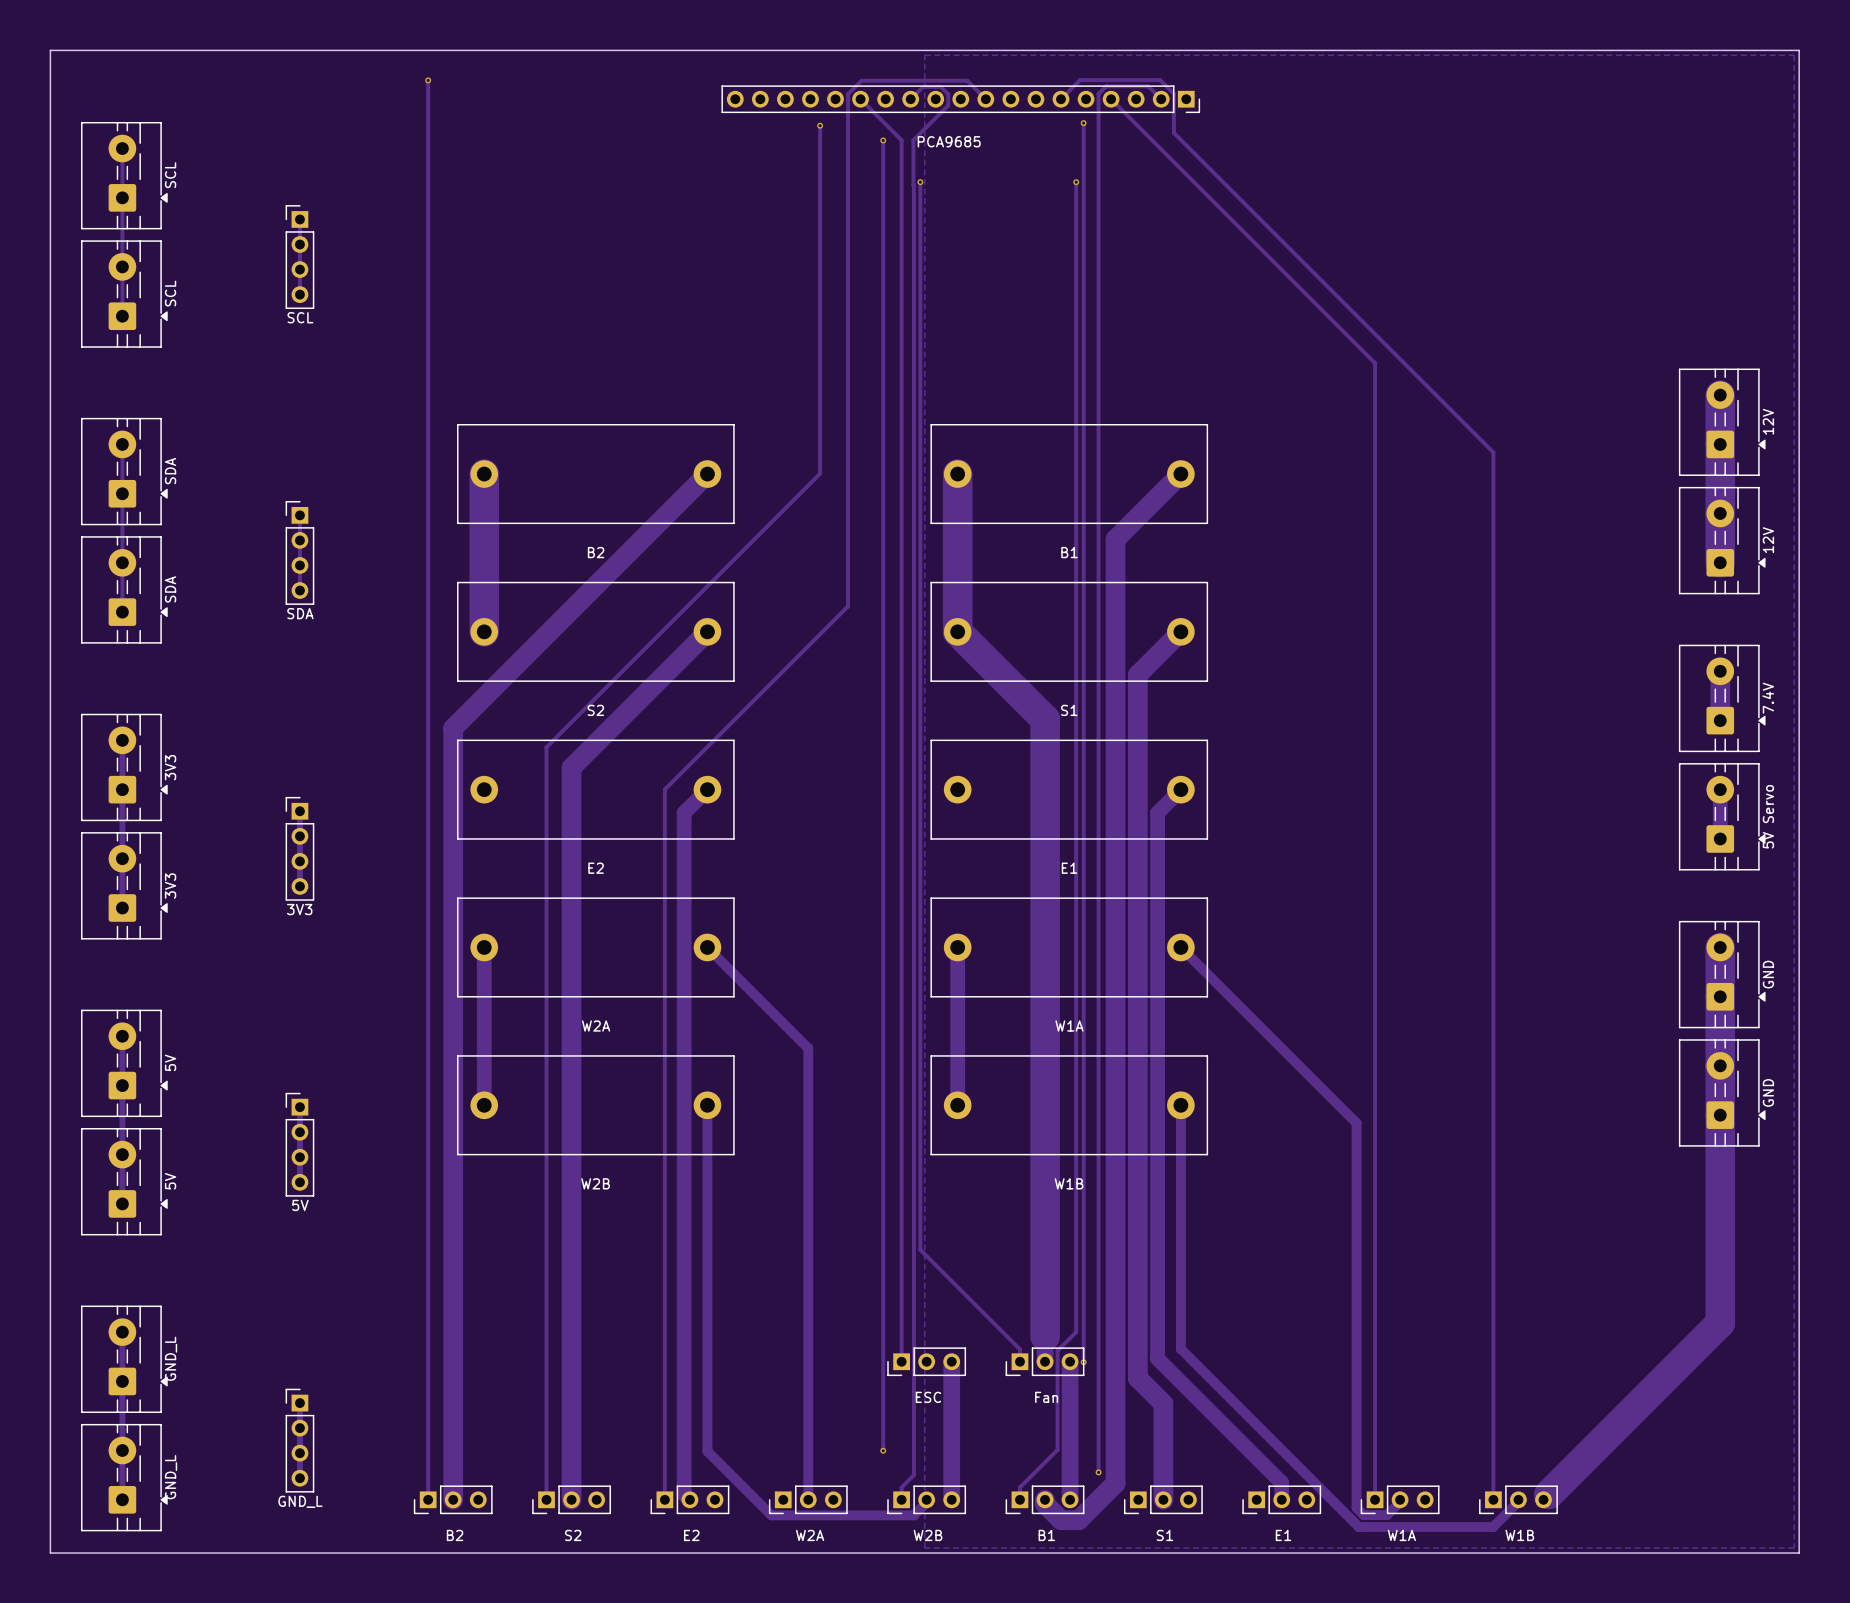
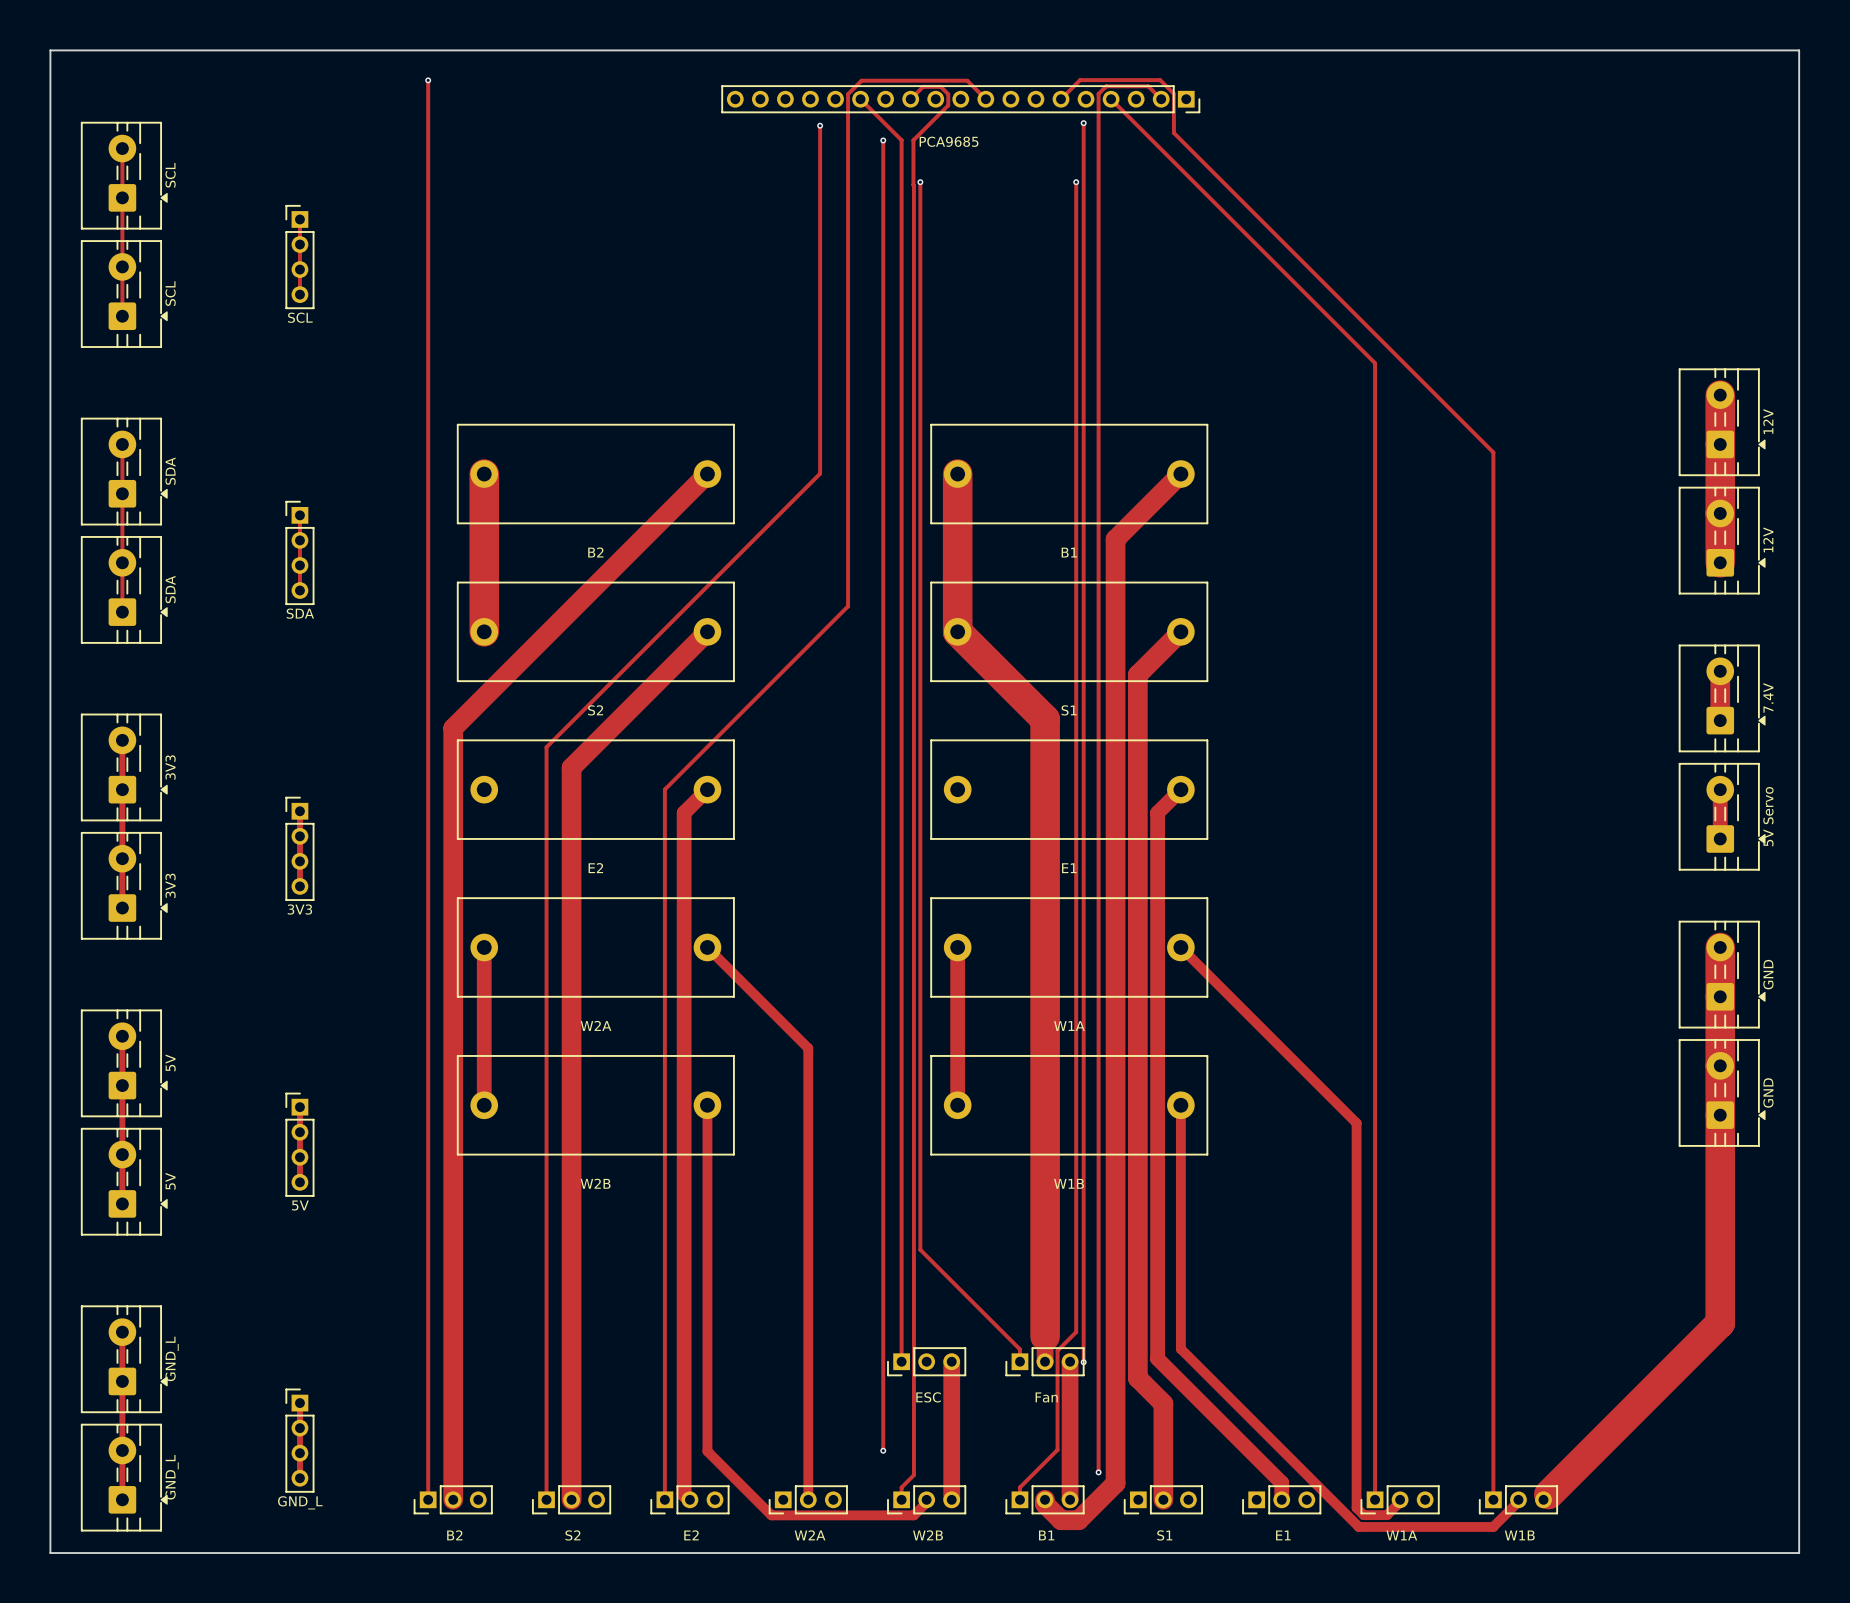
zone outline: (924, 55) (1794, 55) (1794, 1548) (924, 1548) (924, 55) -> none

